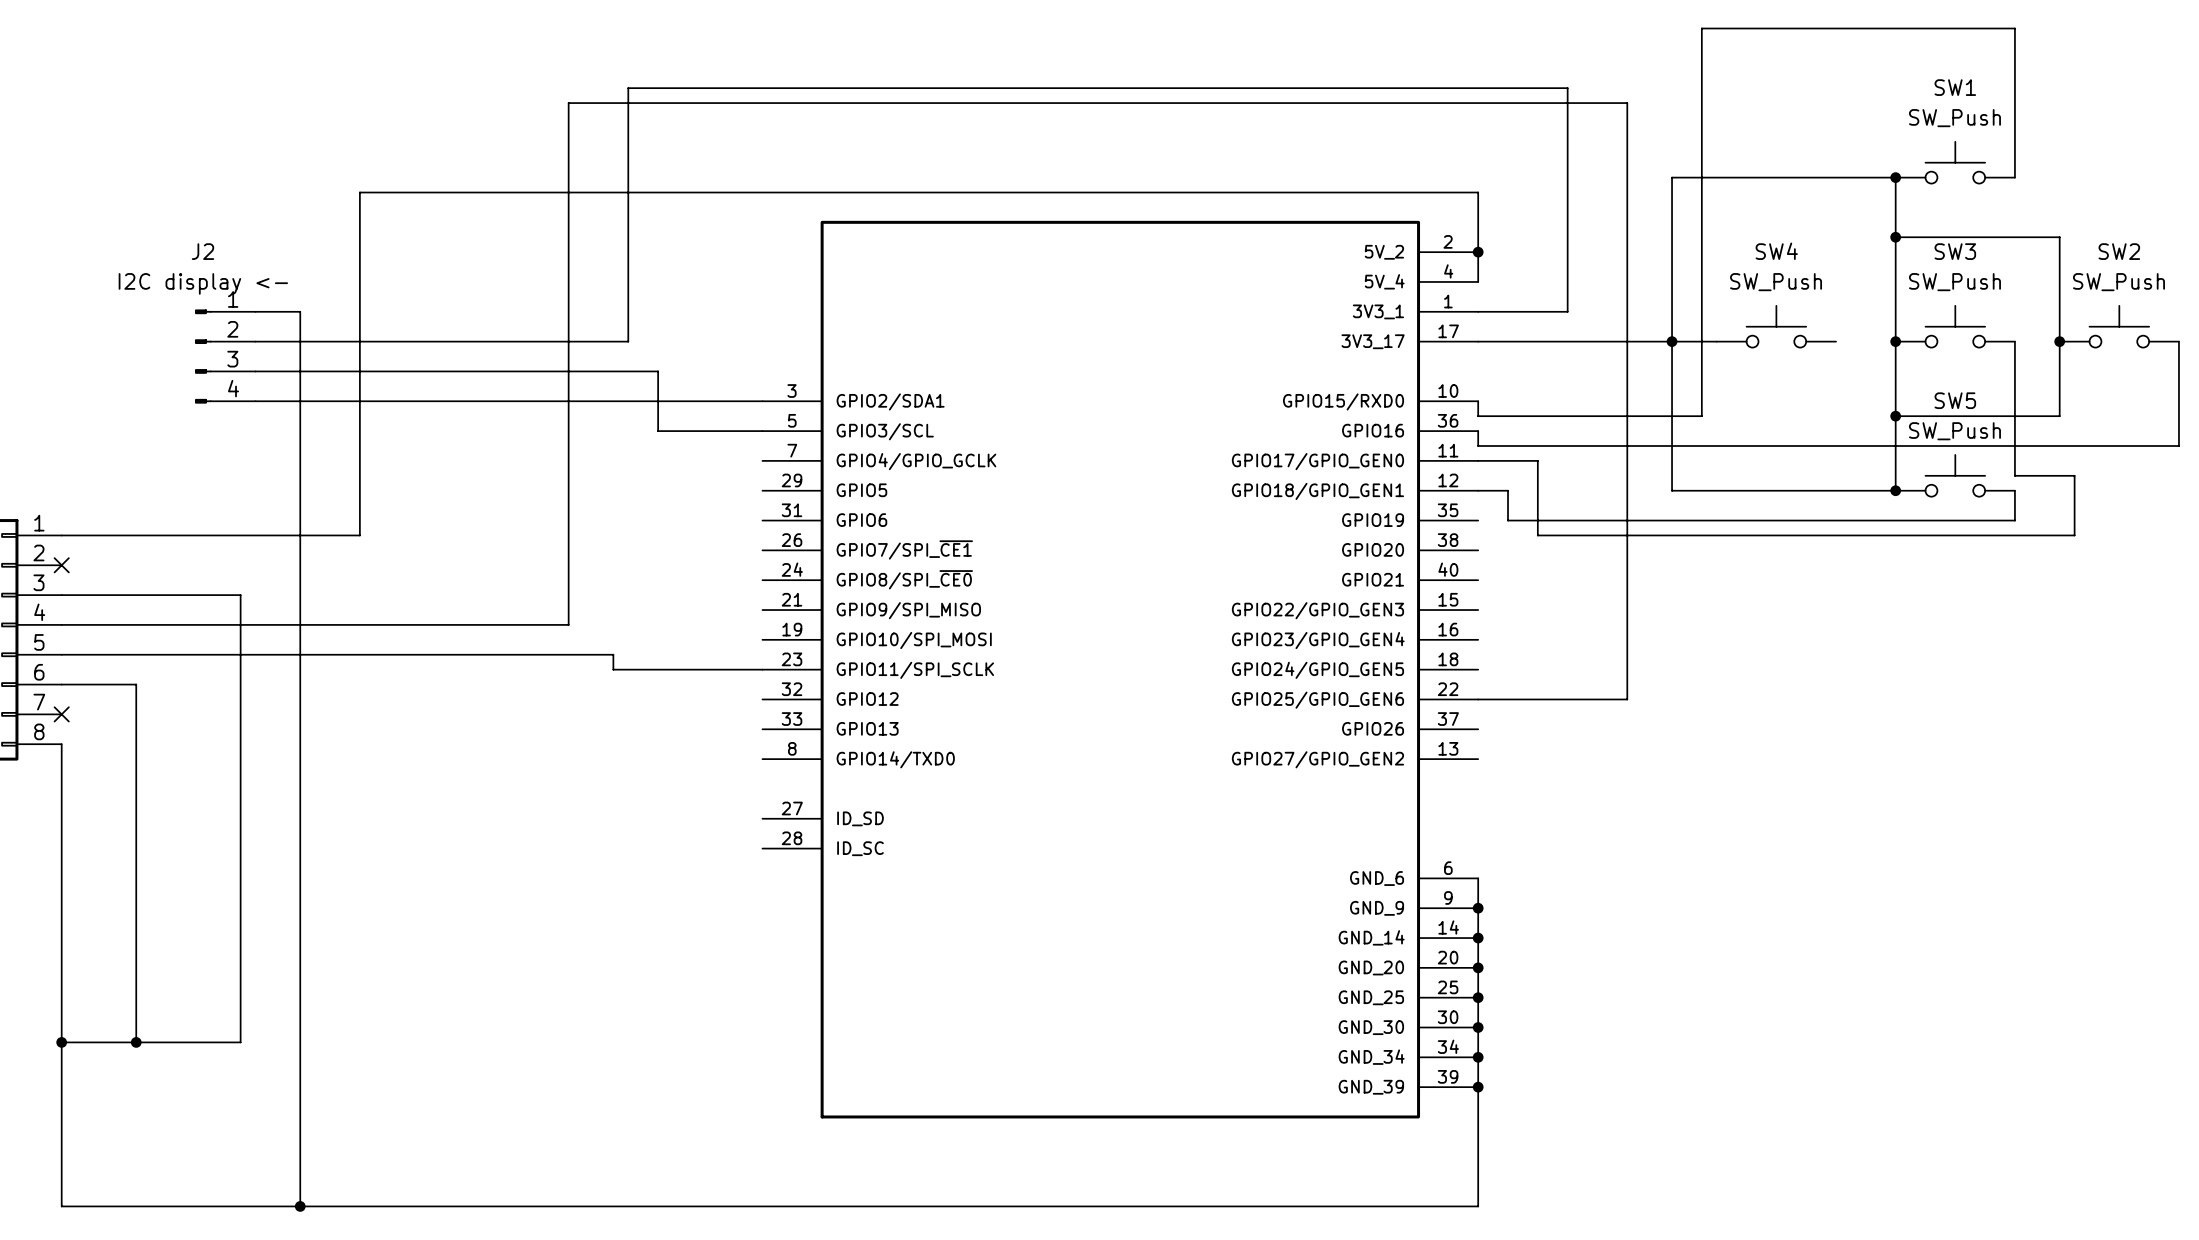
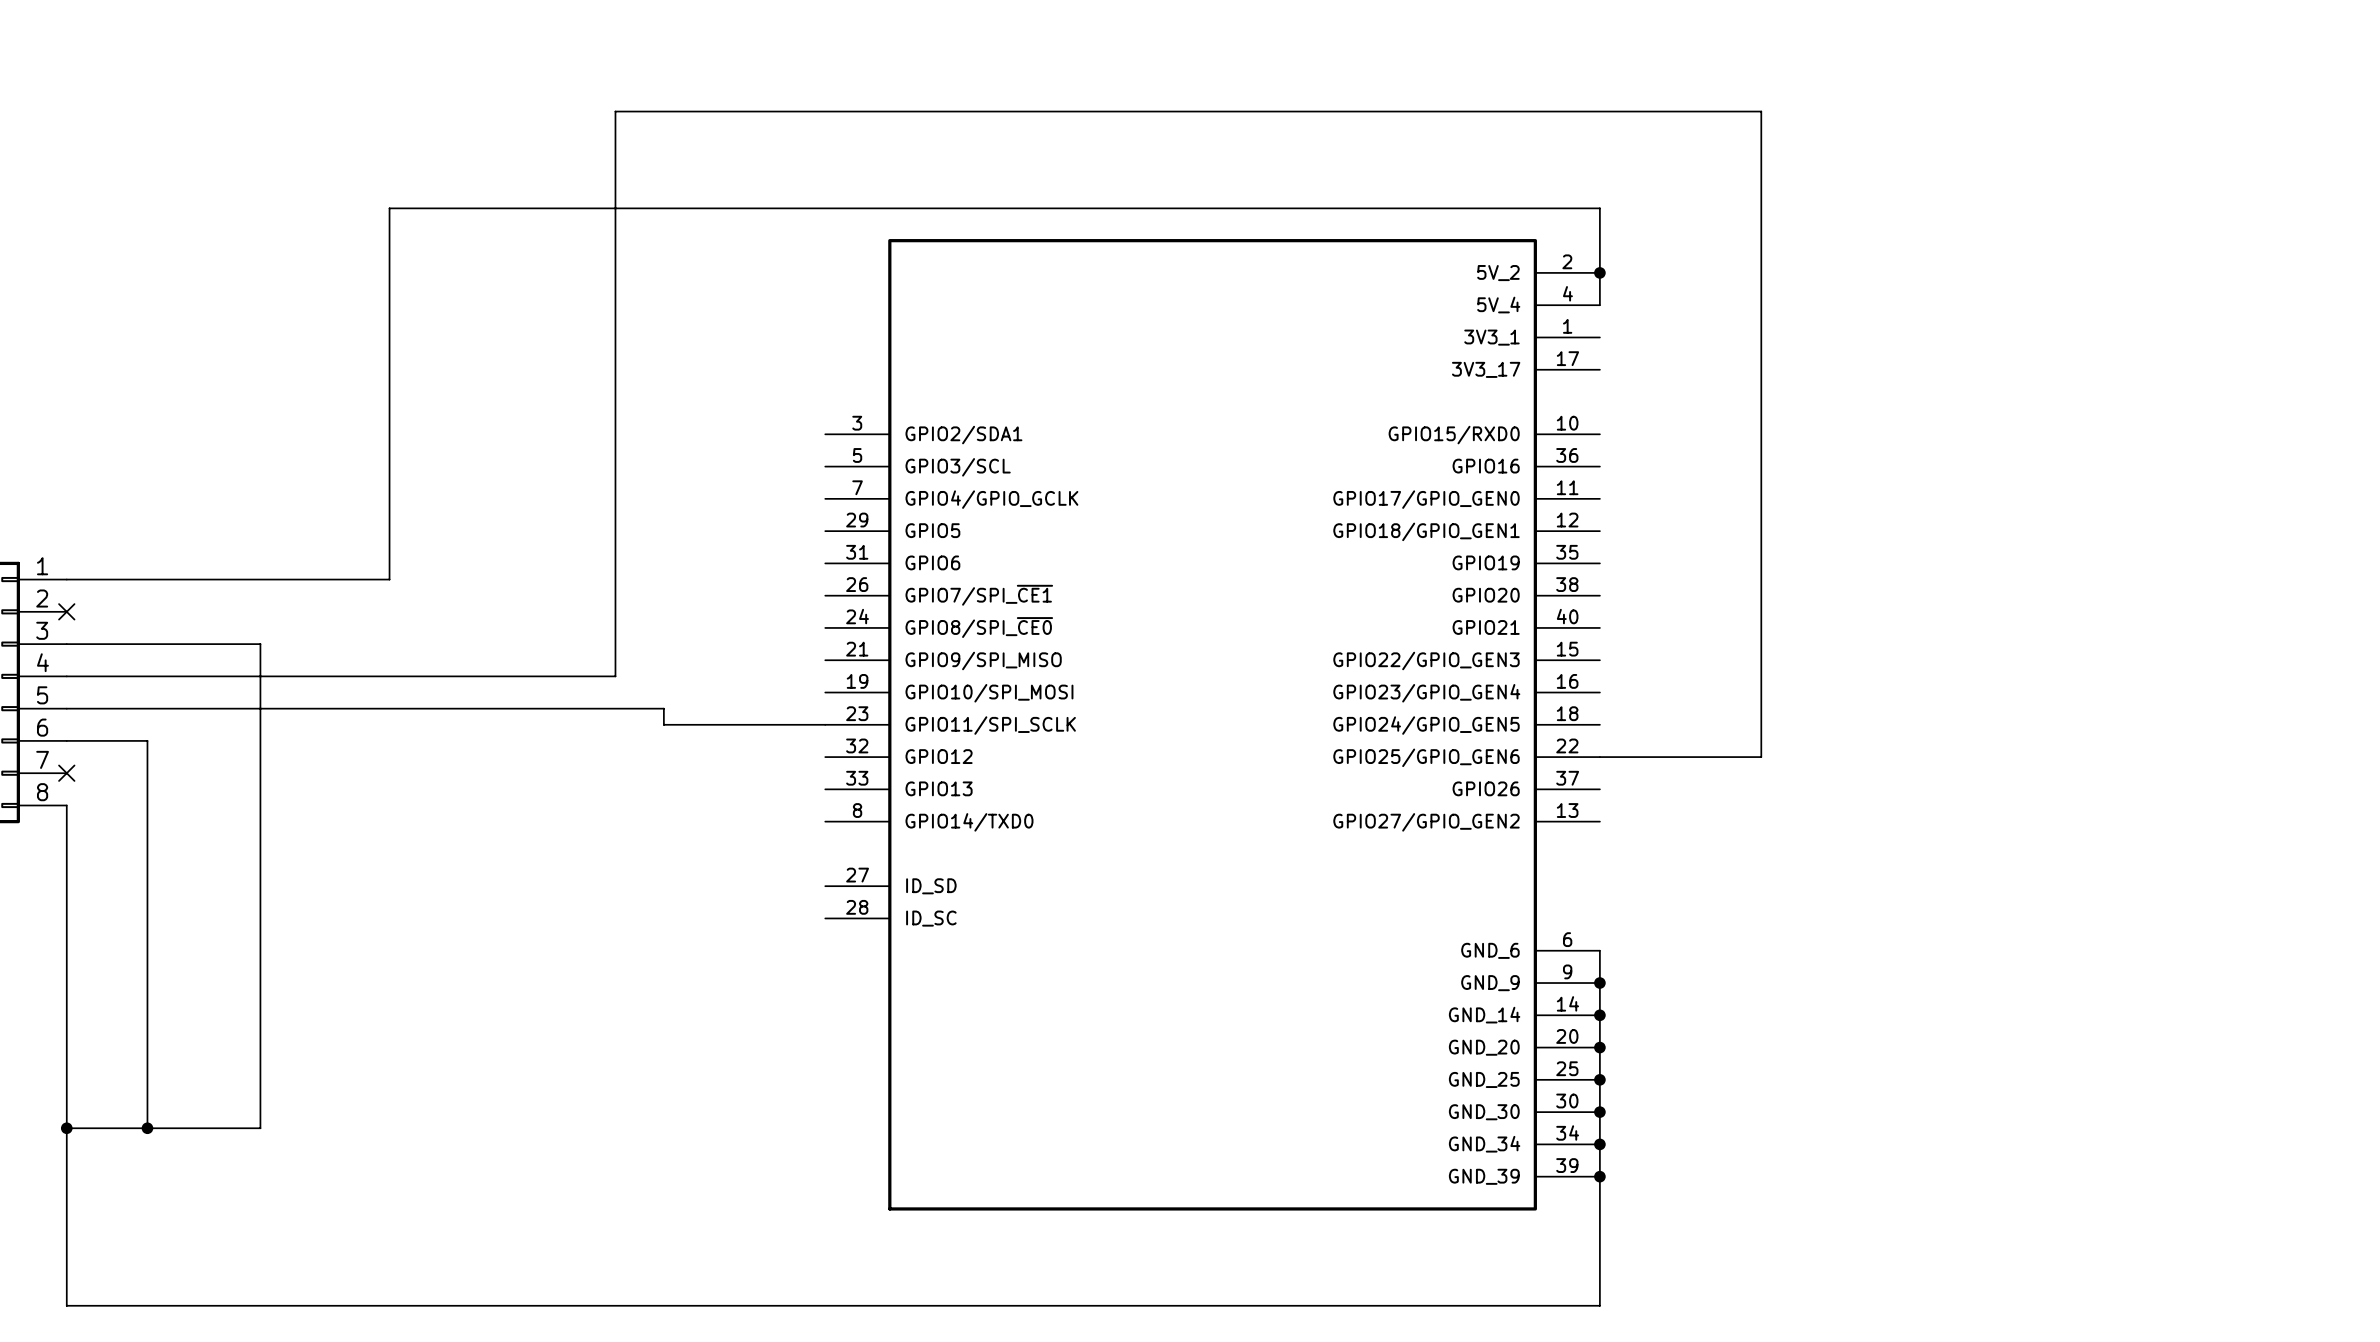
SW1: SW_Push (1955, 162) -> none
wire: (1672, 177) (1672, 490) (1895, 490) (1895, 177) (1672, 177) -> none
junction: (1895, 177) -> none
wire: (2014, 177) (2014, 28) (1701, 28) (1701, 416) (1478, 416) (1478, 401) -> none
wire: (1895, 237) (2059, 237) (2059, 416) (1895, 416) -> none
junction: (1895, 237) -> none
wire: (255, 311) (300, 311) (300, 1206) -> none
wire: (1478, 311) (1567, 311) (1567, 88) (628, 88) (628, 341) (255, 341) -> none
SW4: SW_Push (1776, 326) -> none
SW3: SW_Push (1955, 326) -> none
SW2: SW_Push (2119, 326) -> none
wire: (1478, 341) (1716, 341) -> none
junction: (1672, 341) -> none
junction: (1895, 341) -> none
wire: (2014, 341) (2014, 475) (2074, 475) (2074, 535) (1537, 535) (1537, 460) (1478, 460) -> none
junction: (2059, 341) -> none
wire: (2178, 341) (2178, 445) (1478, 445) (1478, 431) -> none
J2: I2C display <- (225, 356) -> none
wire: (255, 371) (658, 371) (658, 431) (762, 431) -> none
wire: (255, 401) (762, 401) -> none
junction: (1895, 416) -> none
SW5: SW_Push (1955, 475) -> none
wire: (1478, 490) (1508, 490) (1508, 520) (2014, 520) (2014, 490) -> none
junction: (1895, 490) -> none
junction: (300, 1206) -> none

